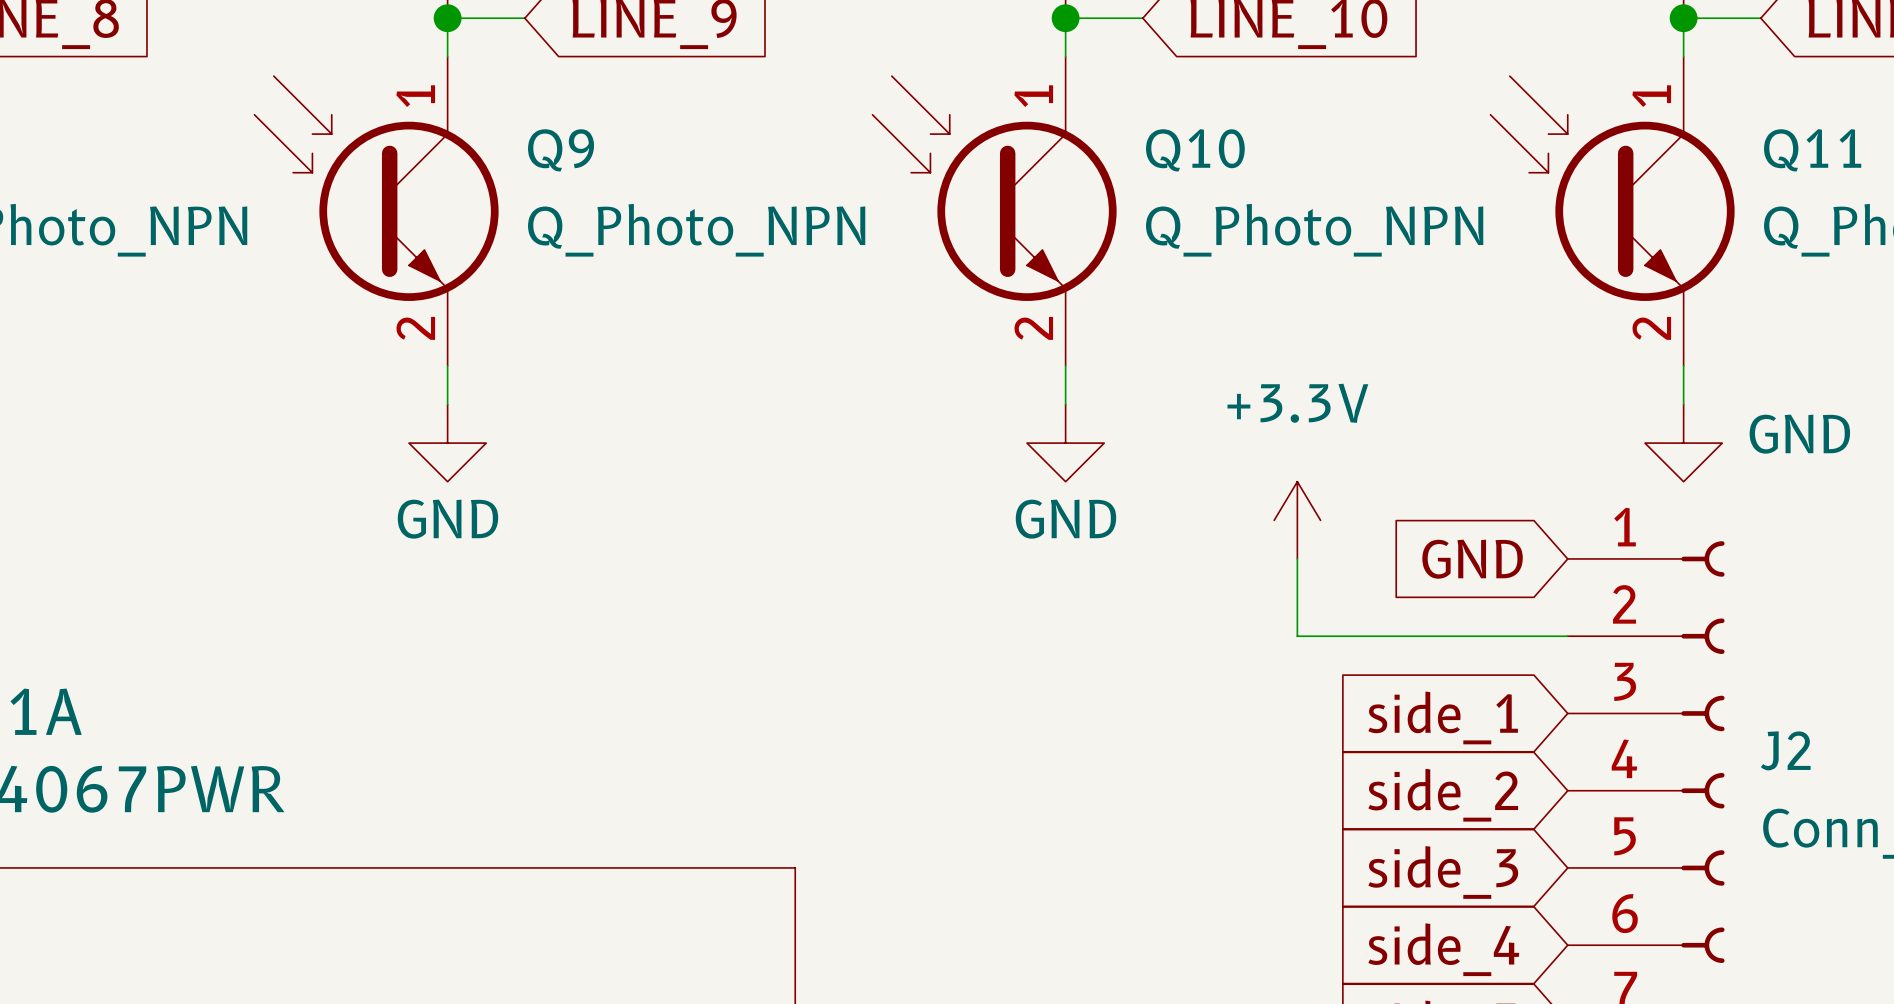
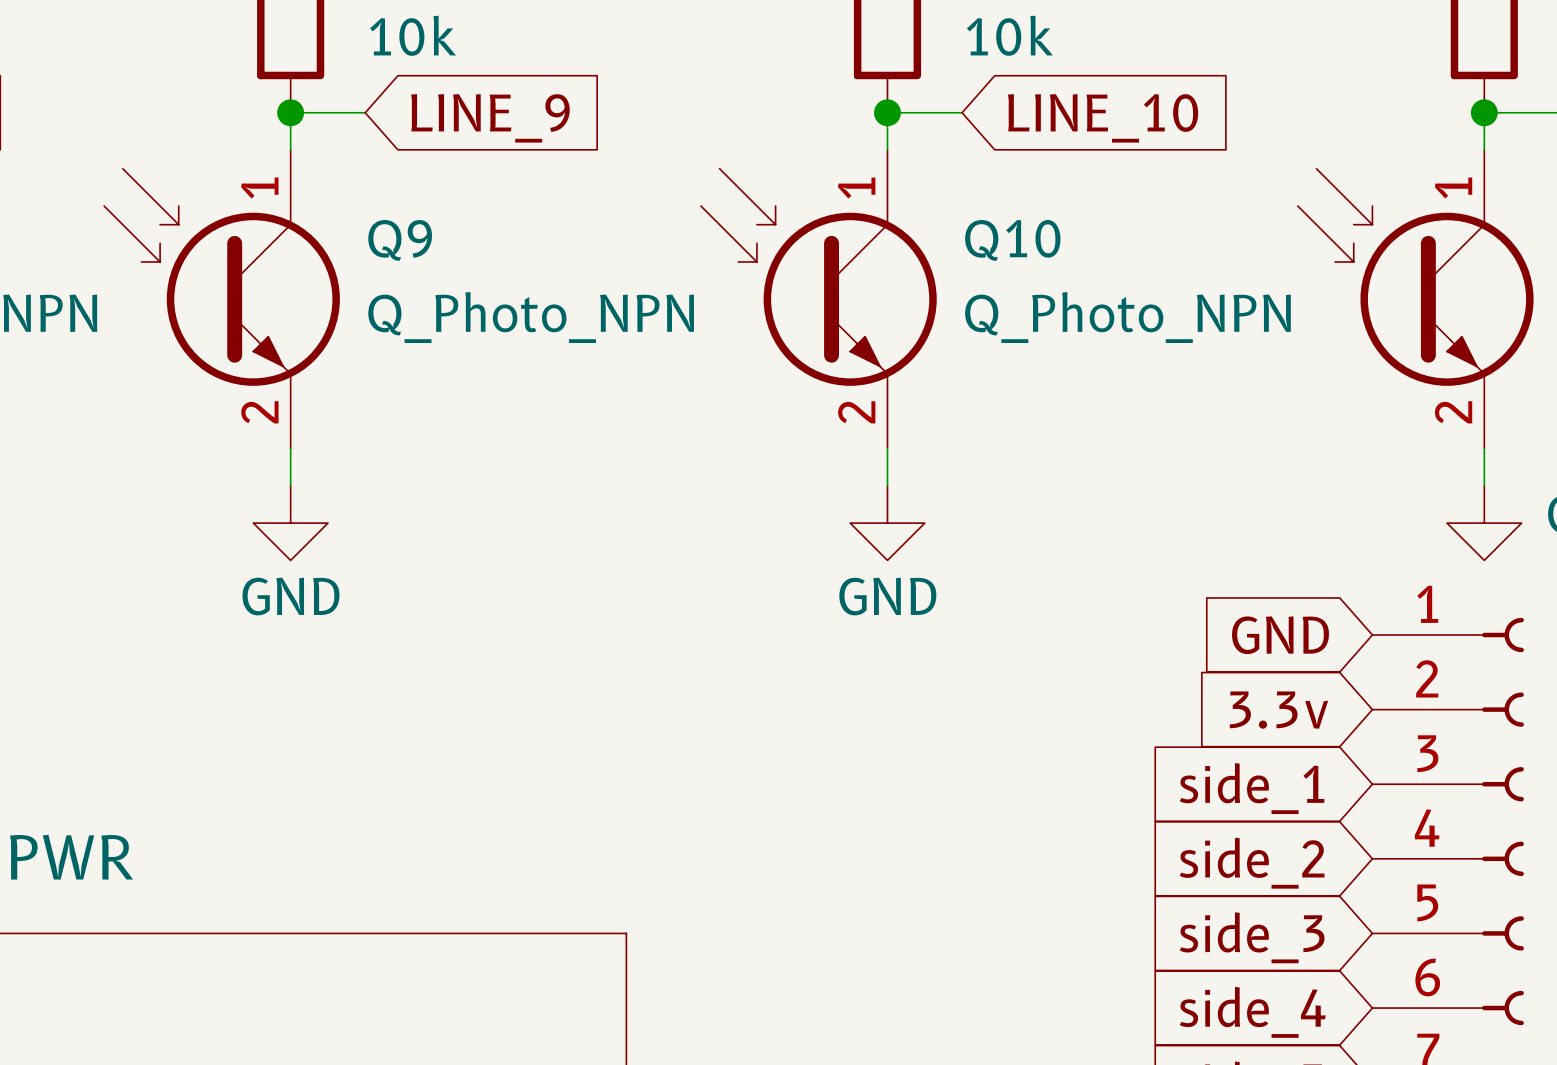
power symbol: +3.3V (1297, 520) -> none
wire: (1297, 558) (1297, 636) (1567, 636) -> none
global label: none -> 3.3v (1278, 710)

